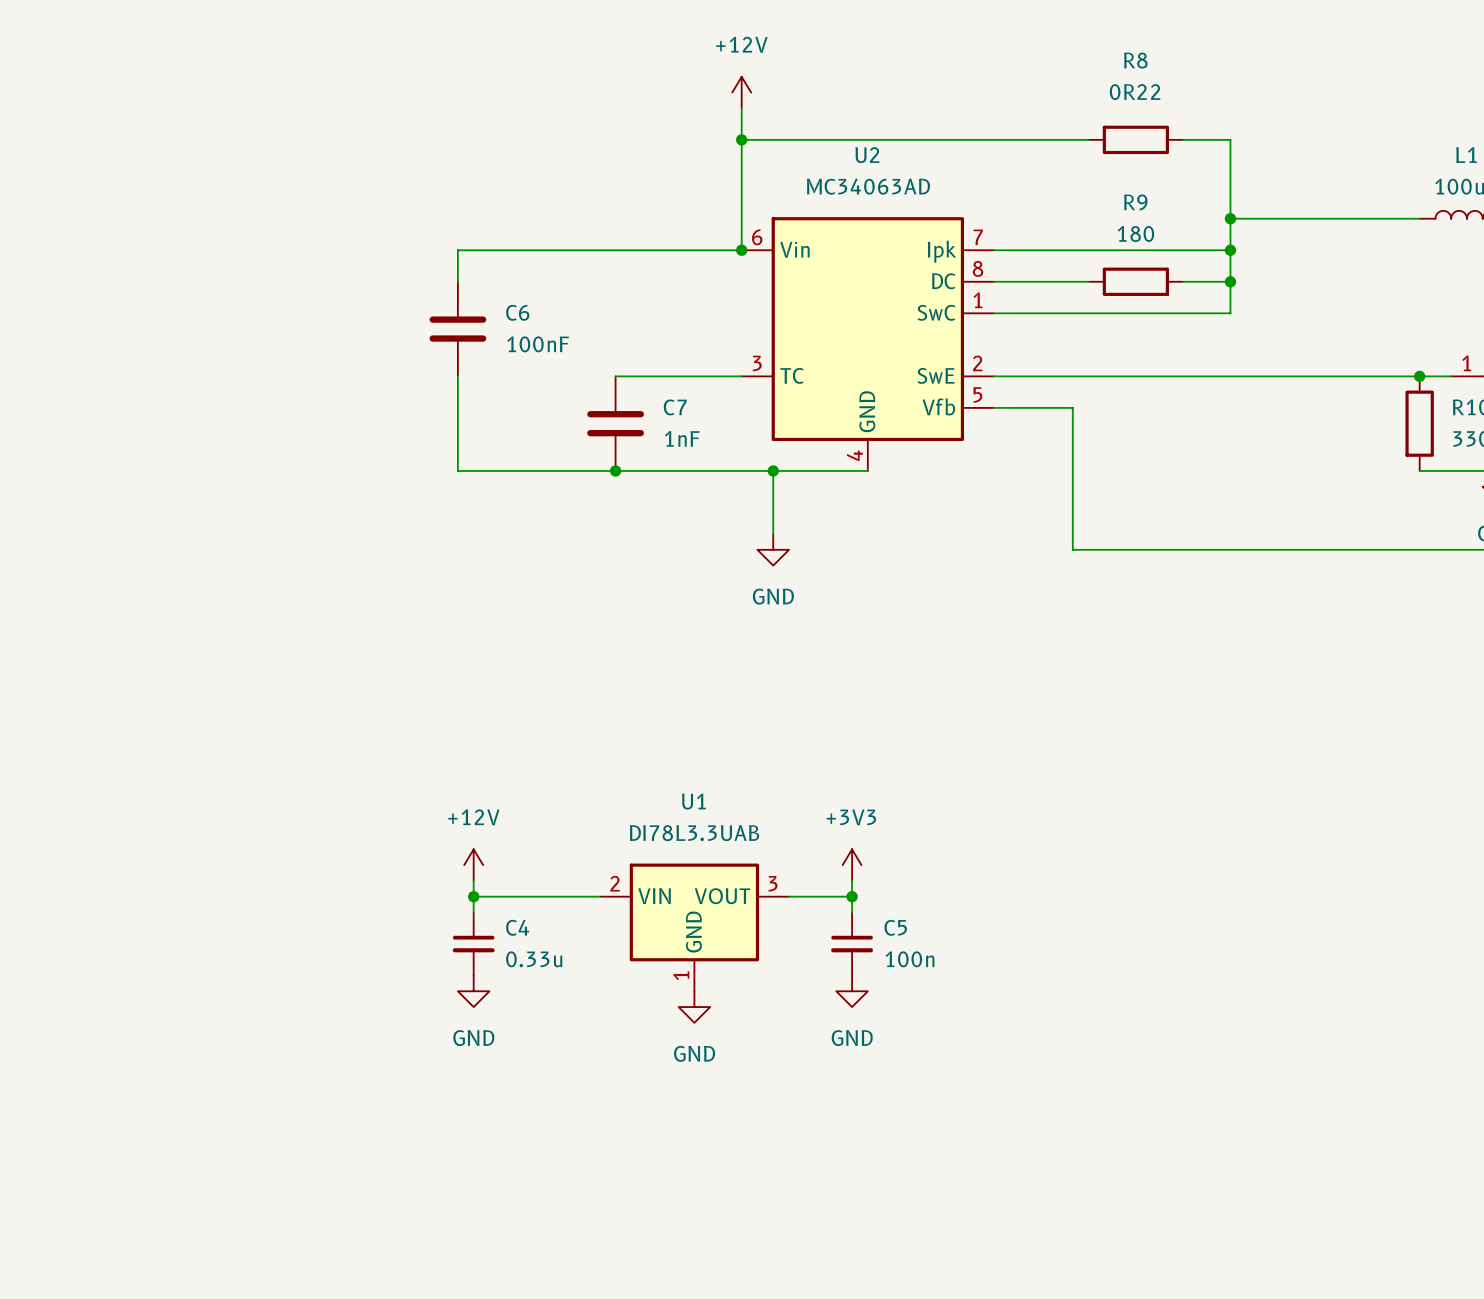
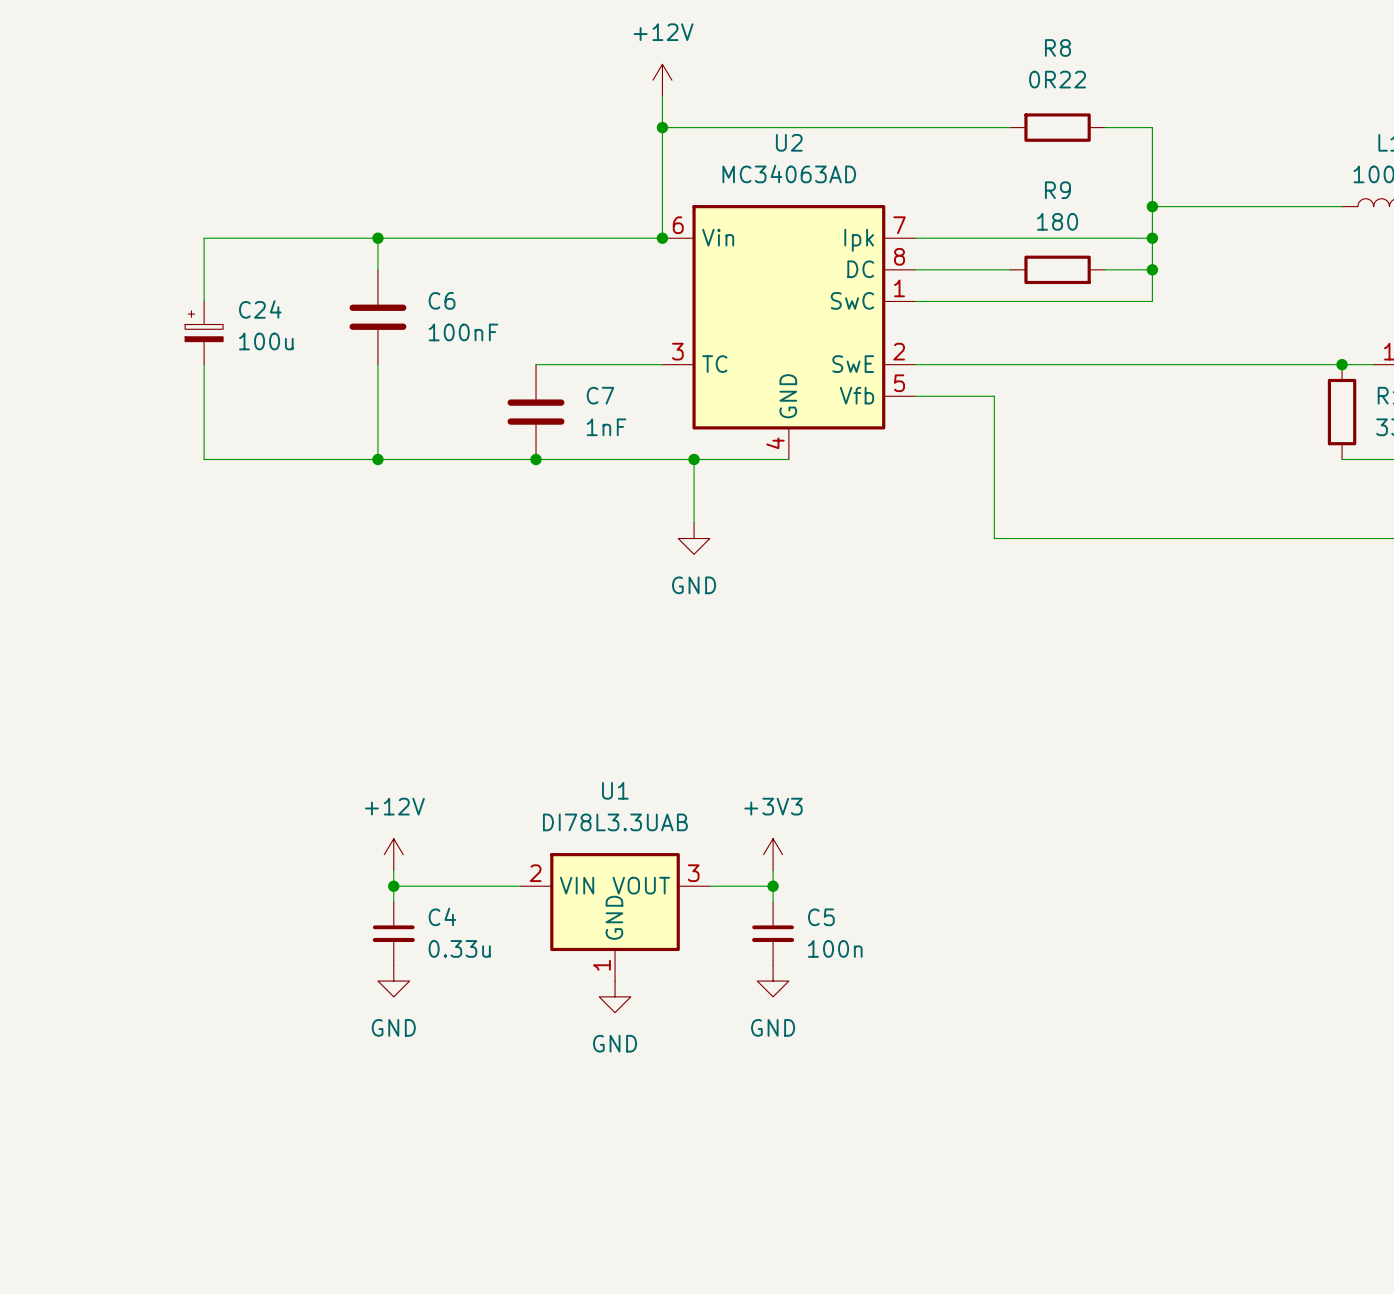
wire: none -> (377, 238) (204, 238) (204, 301)
junction: none -> (377, 238)
C24: none -> 100u (204, 333)
wire: none -> (204, 364) (204, 459) (377, 459)
junction: none -> (377, 459)

